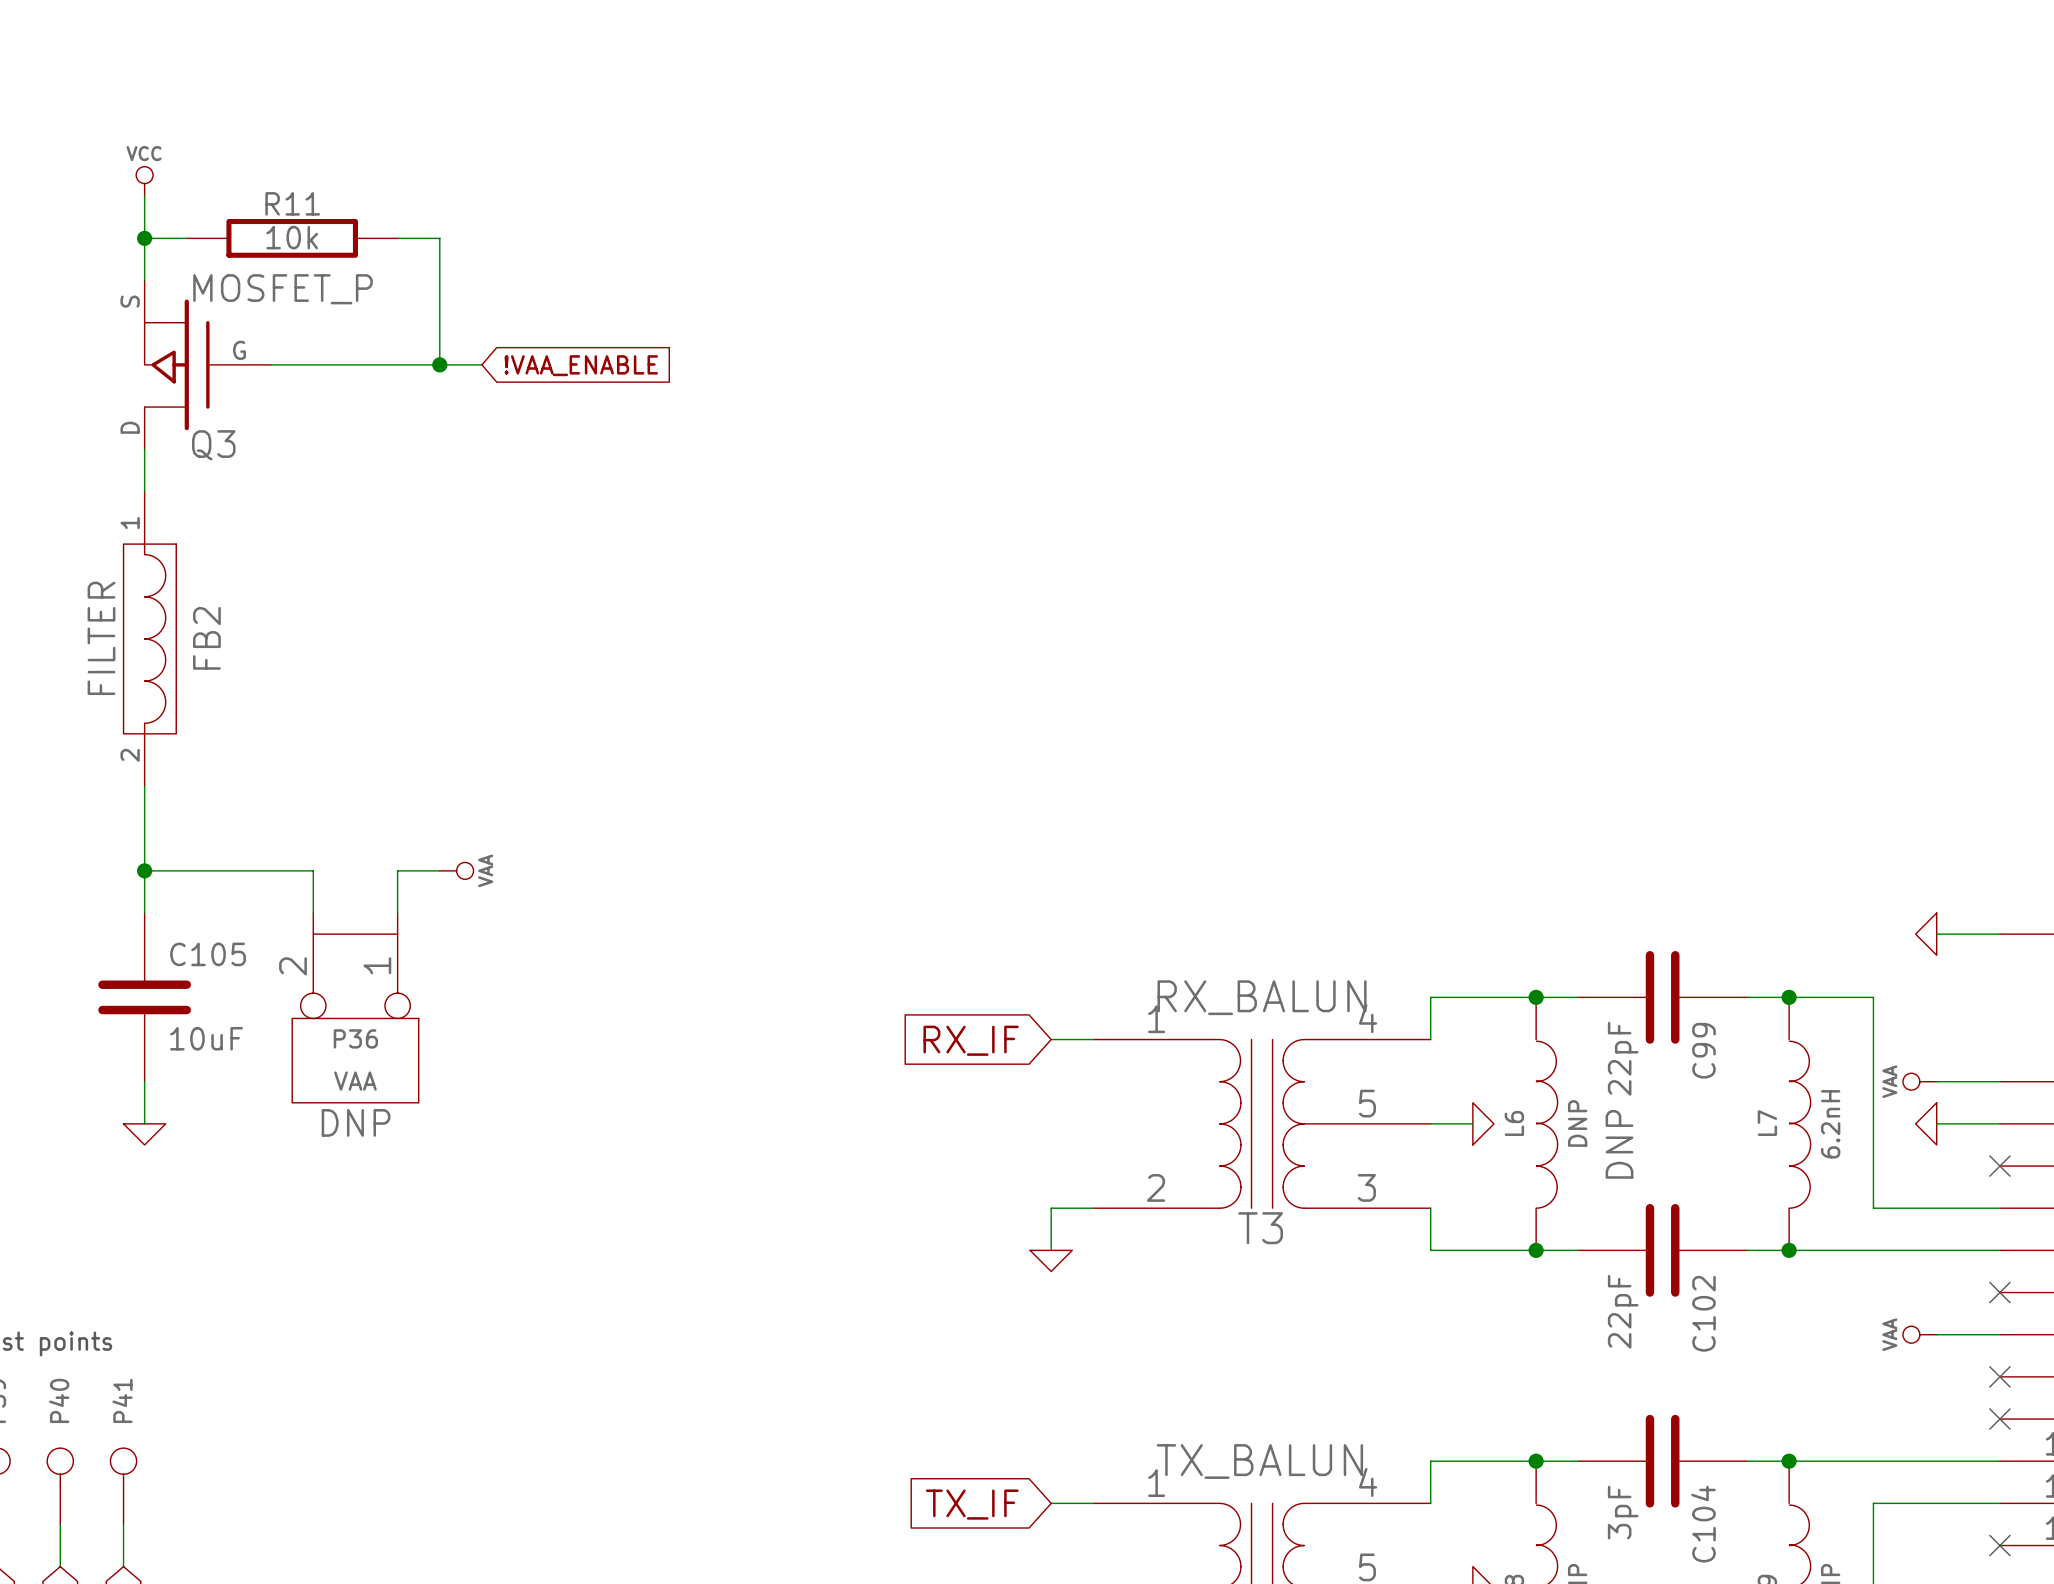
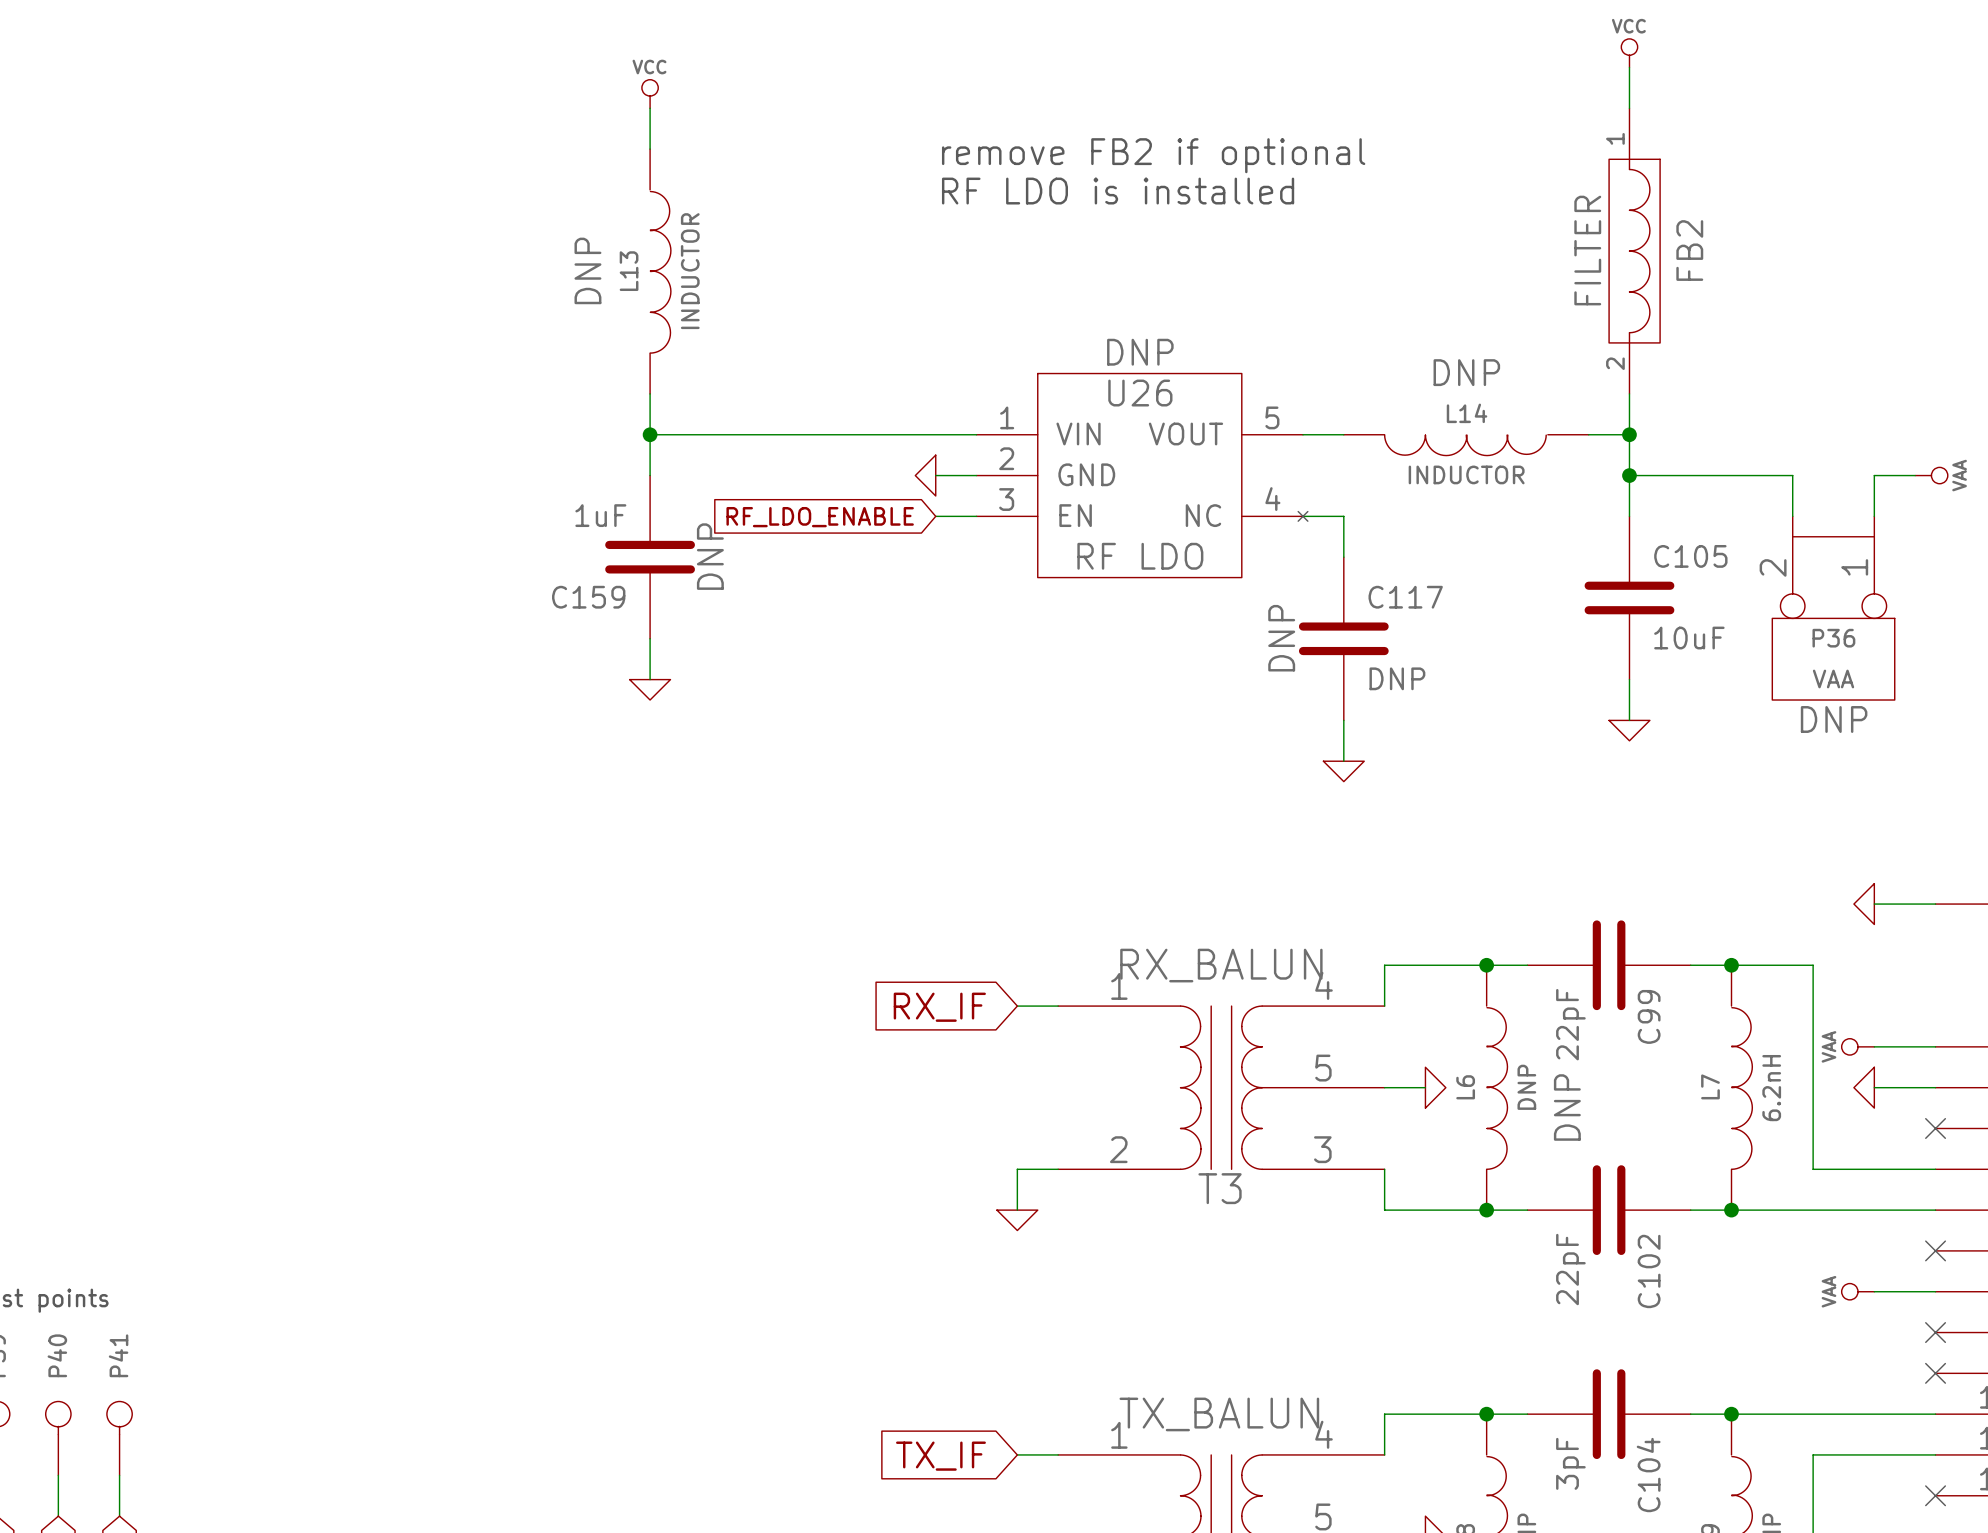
power symbol: none -> VCC (1629, 53)
wire: none -> (1629, 67) (1629, 108)
power symbol: none -> VCC (650, 94)
wire: none -> (650, 108) (650, 149)
text: none -> remove FB2 if optional (1153, 155)
power symbol: VCC (144, 181) -> none
wire: (144, 196) (144, 280) -> none
text: none -> RF LDO is installed (1118, 191)
wire: (144, 238) (186, 238) -> none
junction: (144, 238) -> none
R11: 10k (292, 238) -> none
wire: (397, 238) (439, 238) (439, 364) -> none
L13: none -> INDUCTOR (660, 271)
Q3: MOSFET_P (207, 364) -> none
wire: (271, 364) (481, 364) -> none
junction: (439, 364) -> none
global label: !VAA_ENABLE (581, 365) -> none
wire: none -> (650, 393) (650, 475)
wire: none -> (1629, 393) (1629, 516)
wire: (144, 449) (144, 491) -> none
wire: none -> (650, 434) (976, 434)
junction: none -> (650, 434)
wire: none -> (1303, 434) (1343, 434)
wire: none -> (1588, 434) (1629, 434)
junction: none -> (1629, 434)
L14: none -> INDUCTOR (1466, 445)
power symbol: none -> (925, 475)
wire: none -> (935, 475) (976, 475)
U26: none -> RF LDO (1142, 475)
wire: none -> (1629, 475) (1792, 475) (1792, 516)
junction: none -> (1629, 475)
wire: none -> (1915, 475) (1874, 475) (1874, 516)
power symbol: none -> VAA (1931, 475)
wire: none -> (935, 516) (976, 516)
wire: none -> (1303, 516) (1343, 516) (1343, 557)
global label: none -> RF_LDO_ENABLE (820, 517)
C159: none -> 1uF (650, 557)
FB2 position: (149, 638) -> (1634, 251)
wire: none -> (650, 638) (650, 679)
C117: none -> DNP (1343, 638)
wire: none -> (1629, 679) (1629, 720)
power symbol: none -> (650, 689)
wire: none -> (1343, 720) (1343, 761)
power symbol: none -> (1629, 730)
wire: (144, 786) (144, 913) -> none
power symbol: none -> (1343, 771)
wire: (144, 870) (313, 870) (313, 913) -> none
junction: (144, 870) -> none
wire: (439, 870) (397, 870) (397, 913) -> none
power symbol: VAA (456, 870) -> none
C105 position: (144, 997) -> (1629, 597)
P36 position: (355, 1007) -> (1833, 608)
wire: (144, 1081) (144, 1123) -> none
power symbol: (144, 1134) -> none

